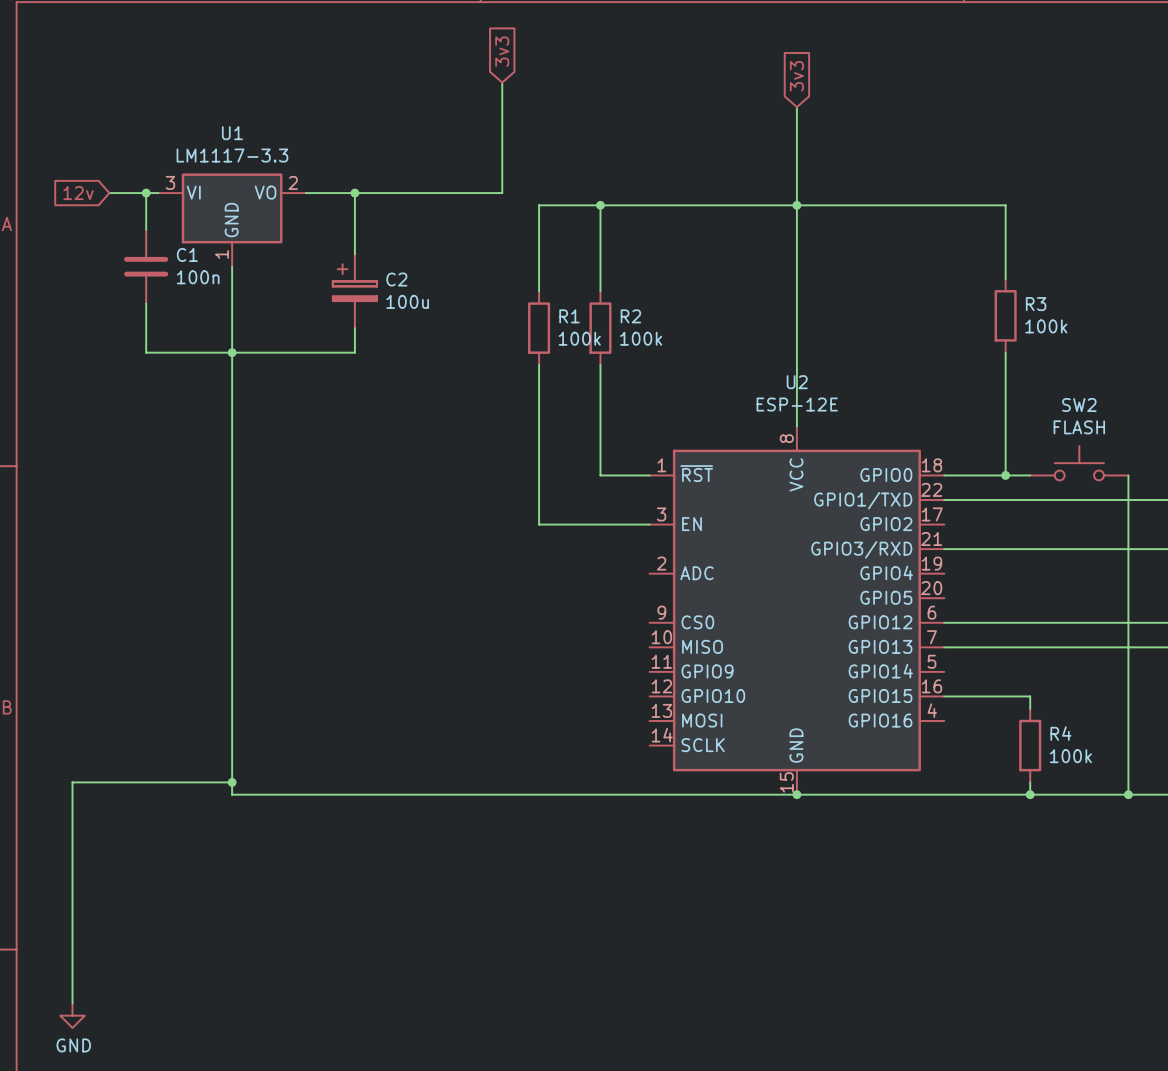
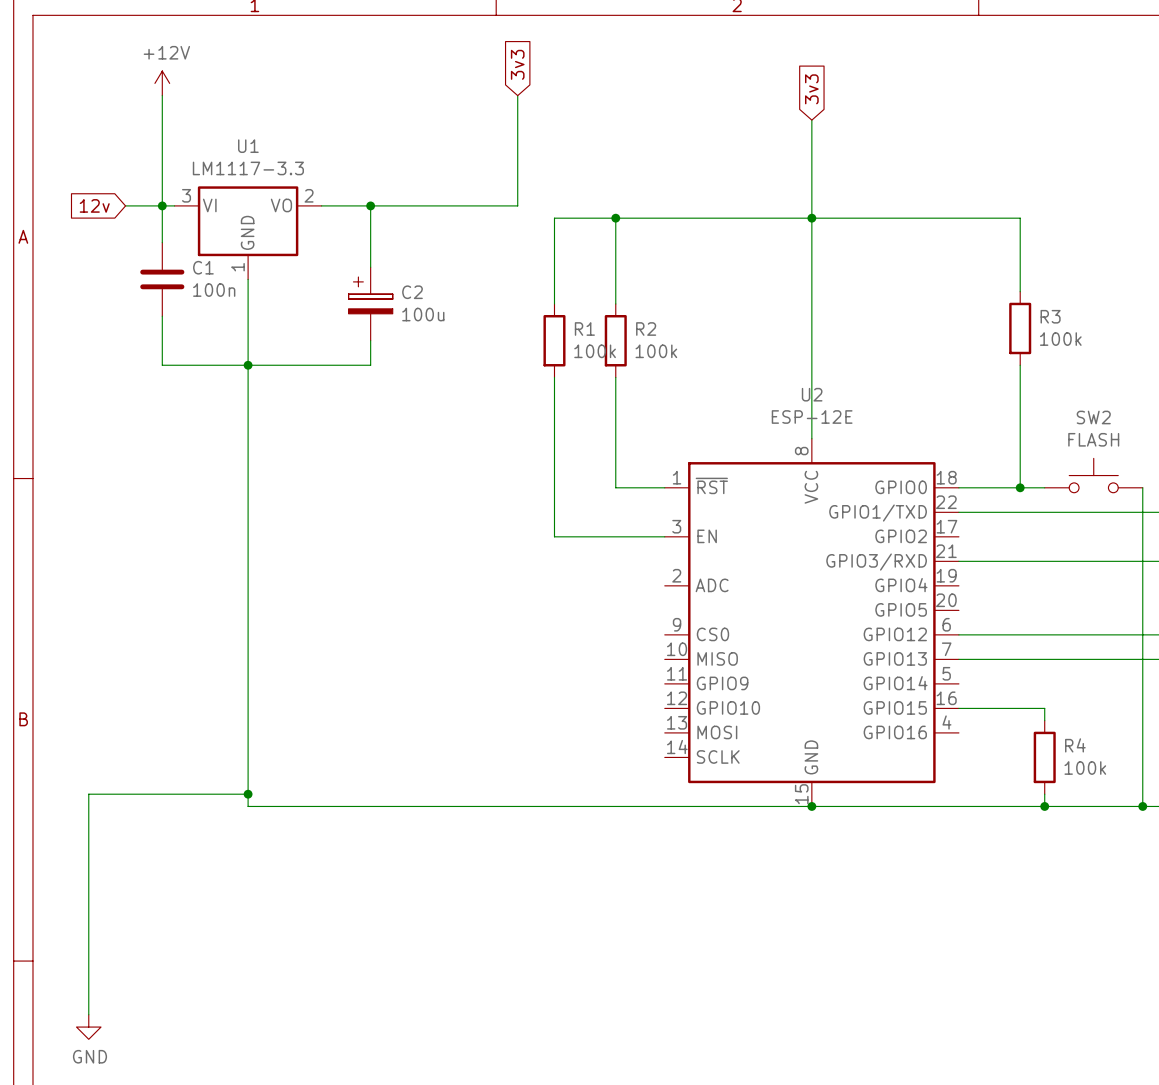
power symbol: none -> +12V (162, 83)
wire: none -> (162, 95) (162, 205)

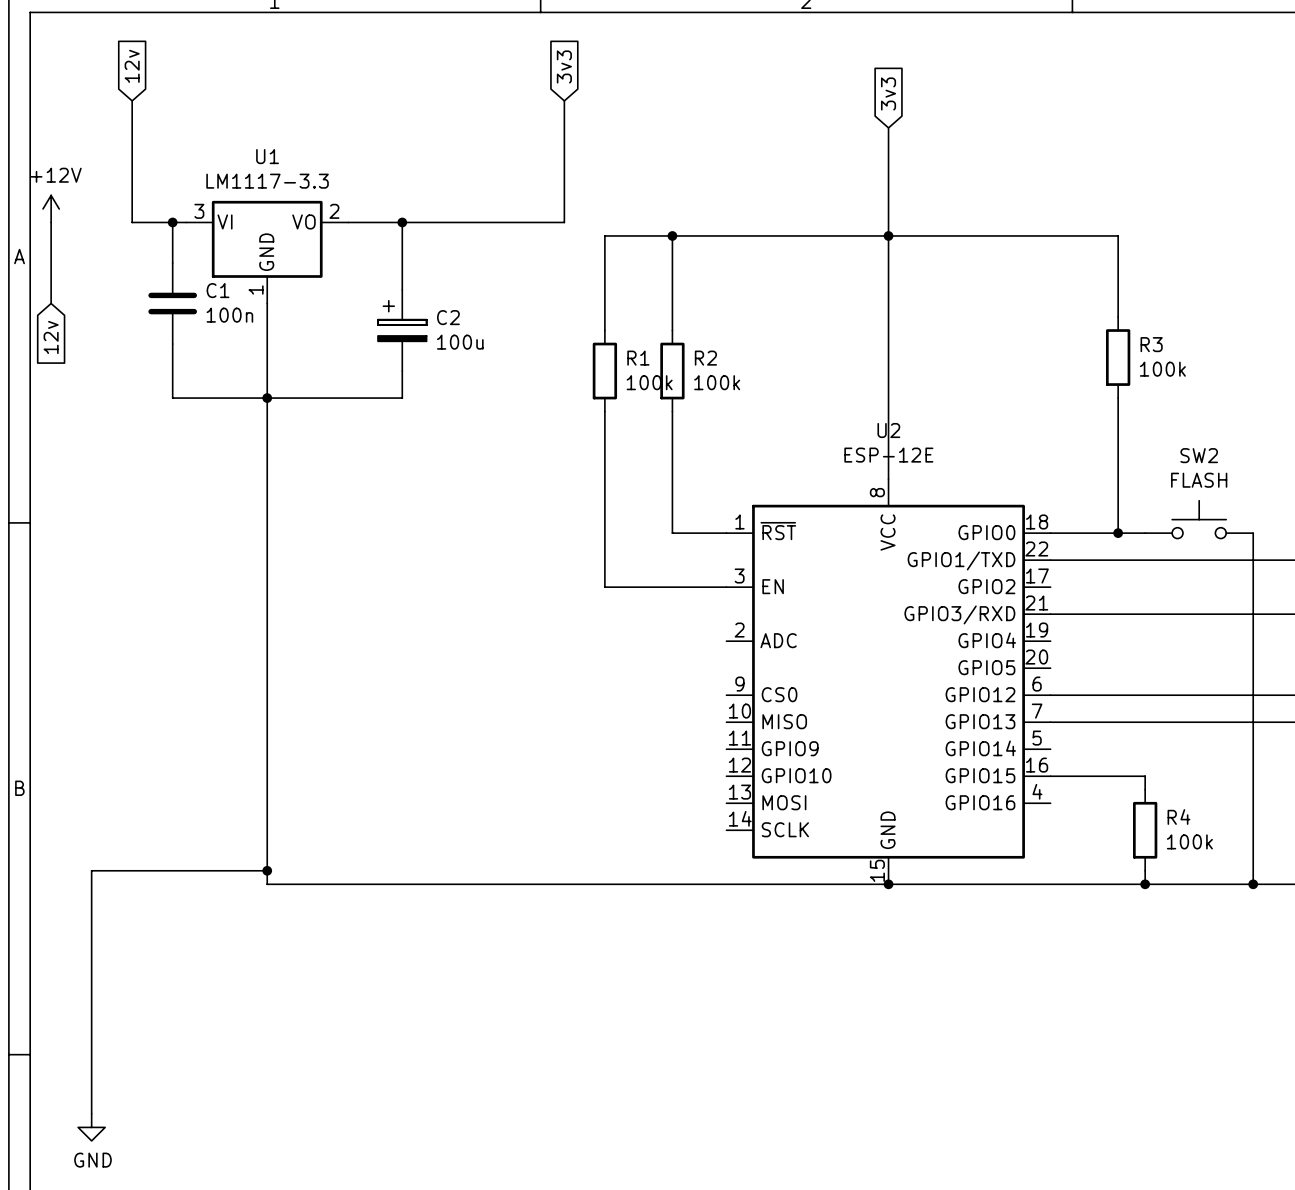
global label: none -> 12v (132, 66)
power symbol position: +12V (162, 83) -> +12V (51, 208)
wire: (162, 95) (162, 205) -> (132, 100) (132, 222)
wire: none -> (51, 222) (51, 303)
global label: 12v (94, 205) -> none
global label: none -> 12v (51, 337)

